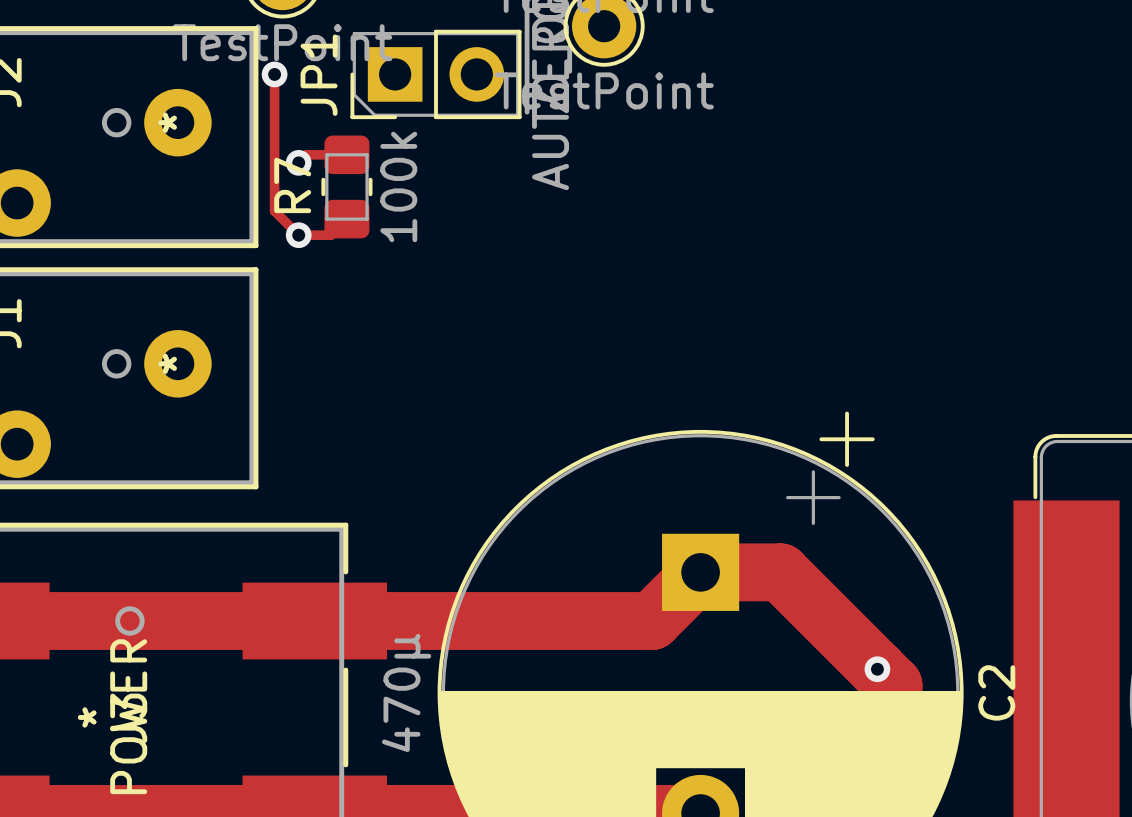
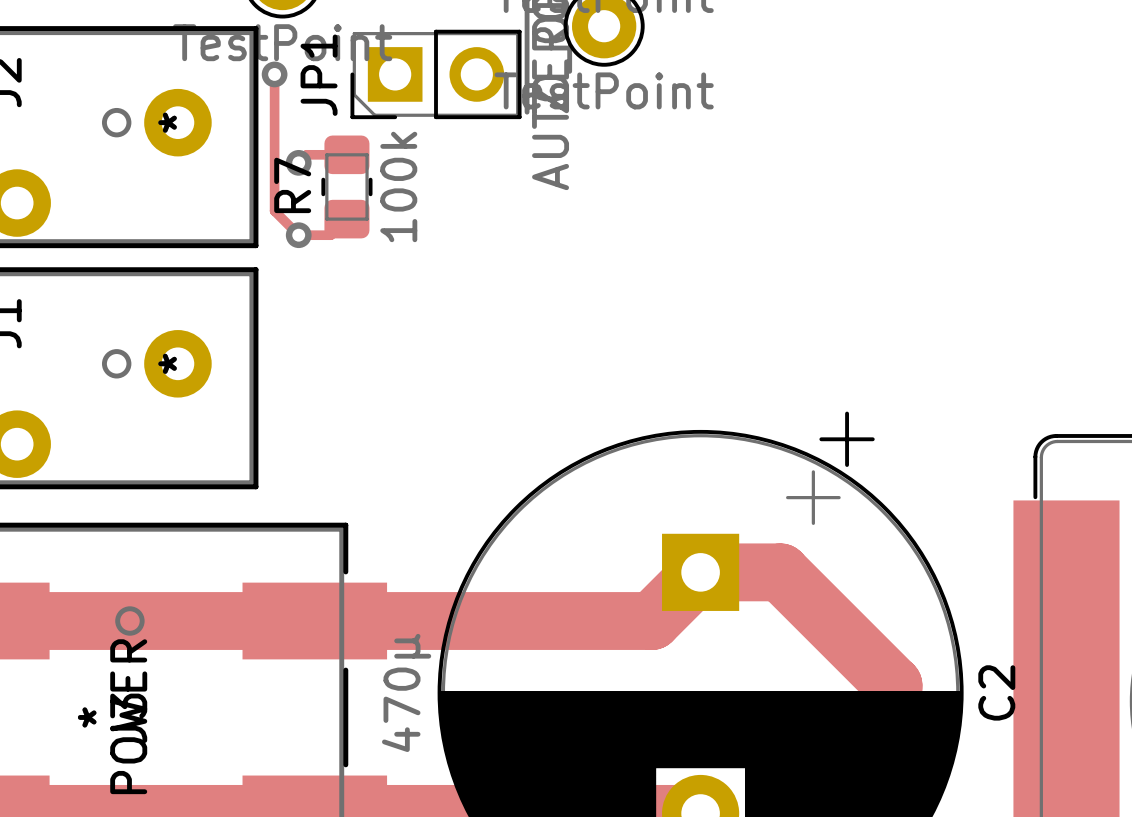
via: (877, 669) -> none

